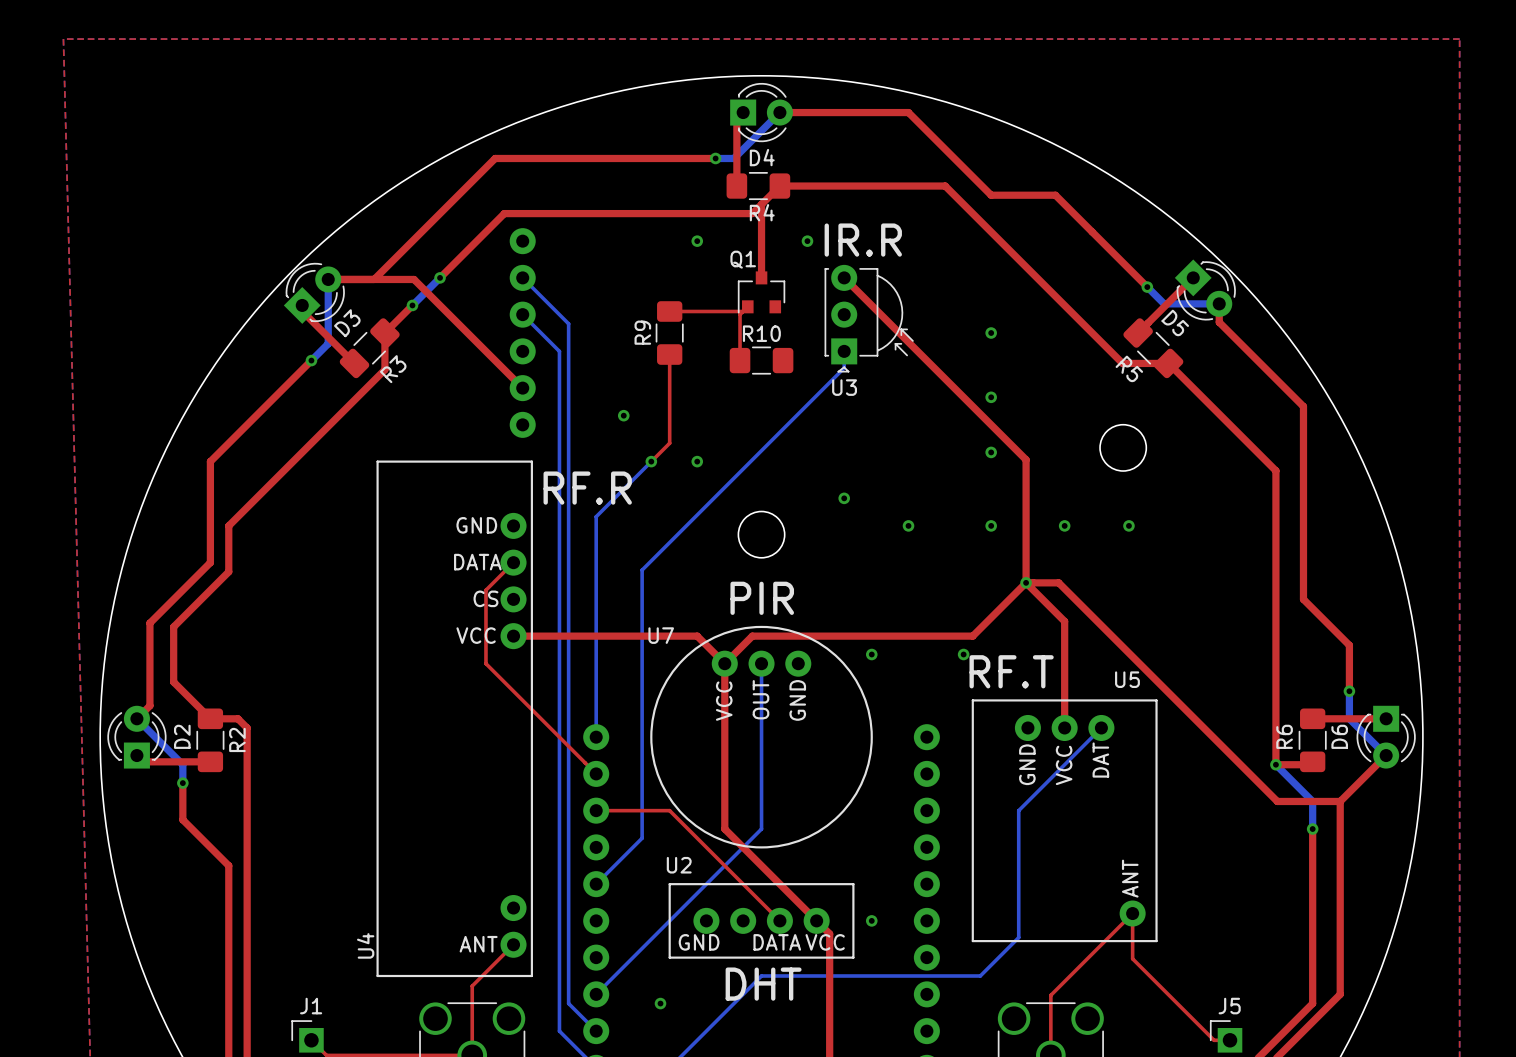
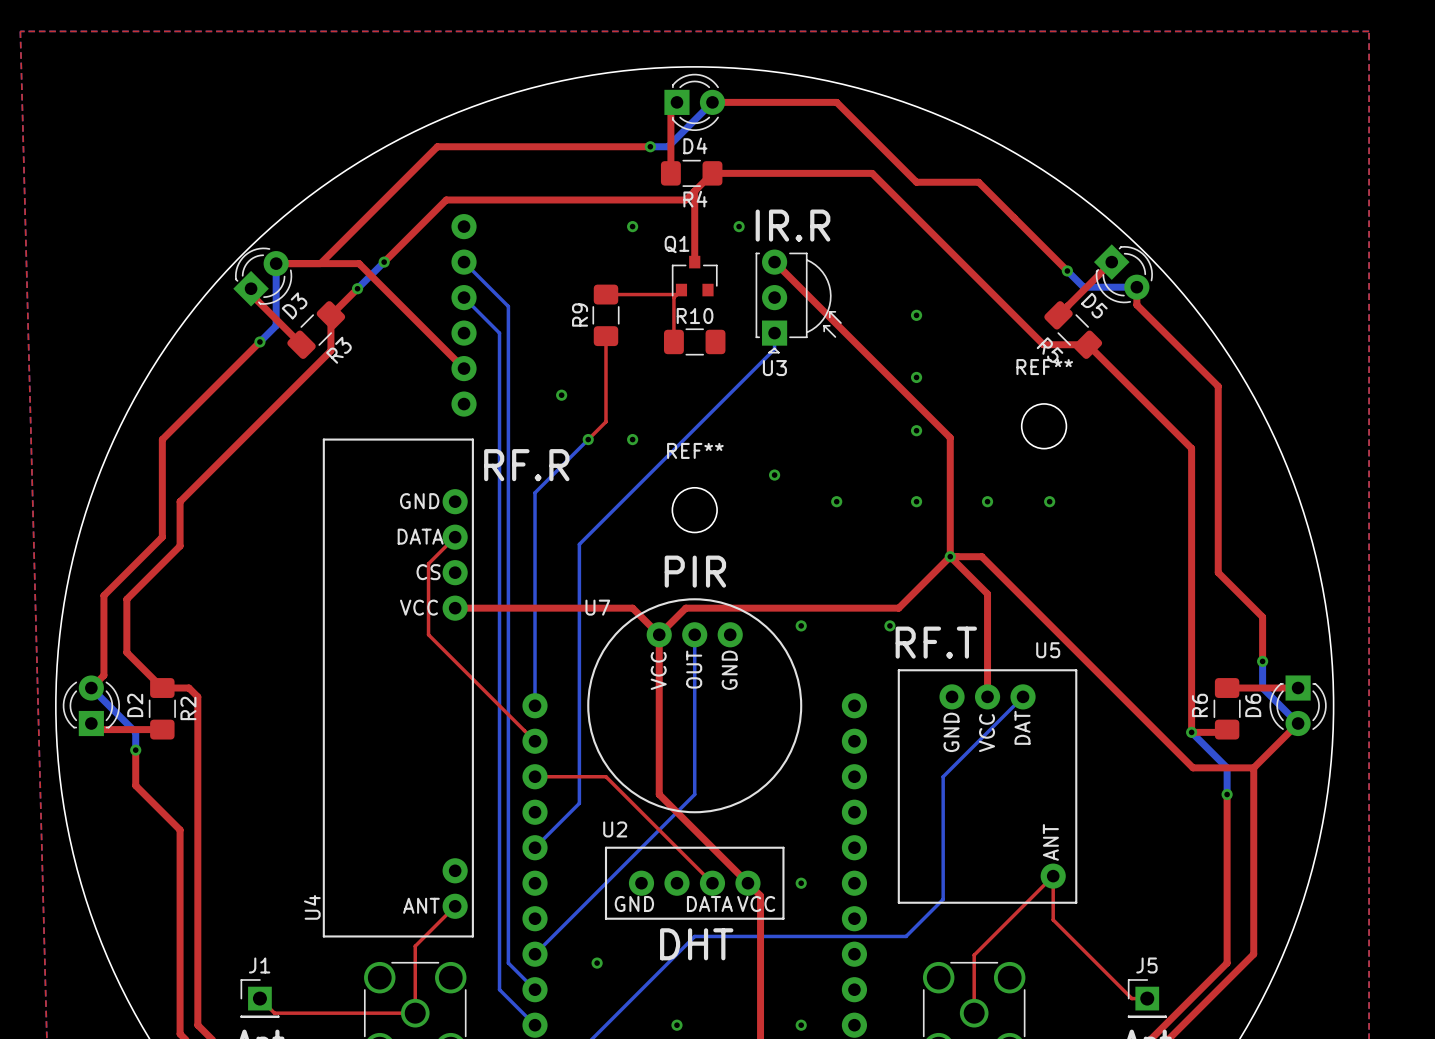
REF** name: none -> REF** (1044, 367)
REF** name: none -> REF** (695, 450)

